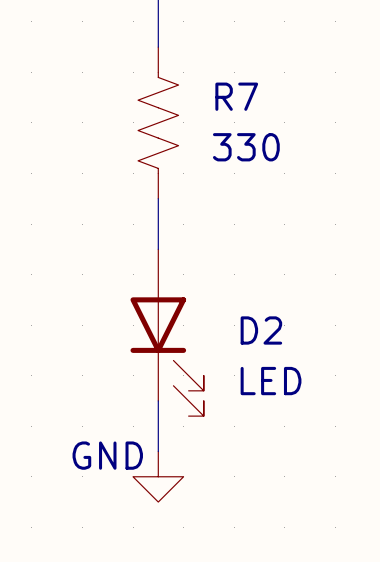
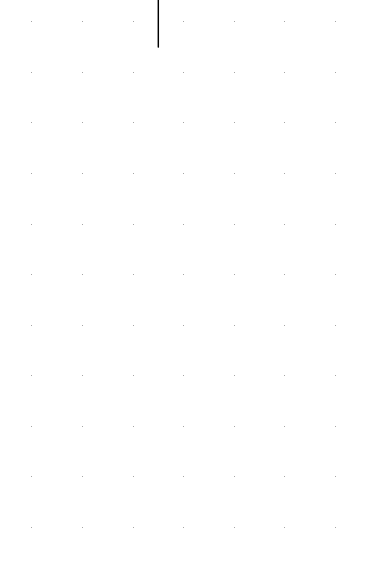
R7: 330 (158, 122) -> none
wire: (158, 198) (158, 249) -> none
D2: LED (167, 332) -> none
wire: (158, 400) (158, 451) -> none
power symbol: GND (158, 476) -> none

